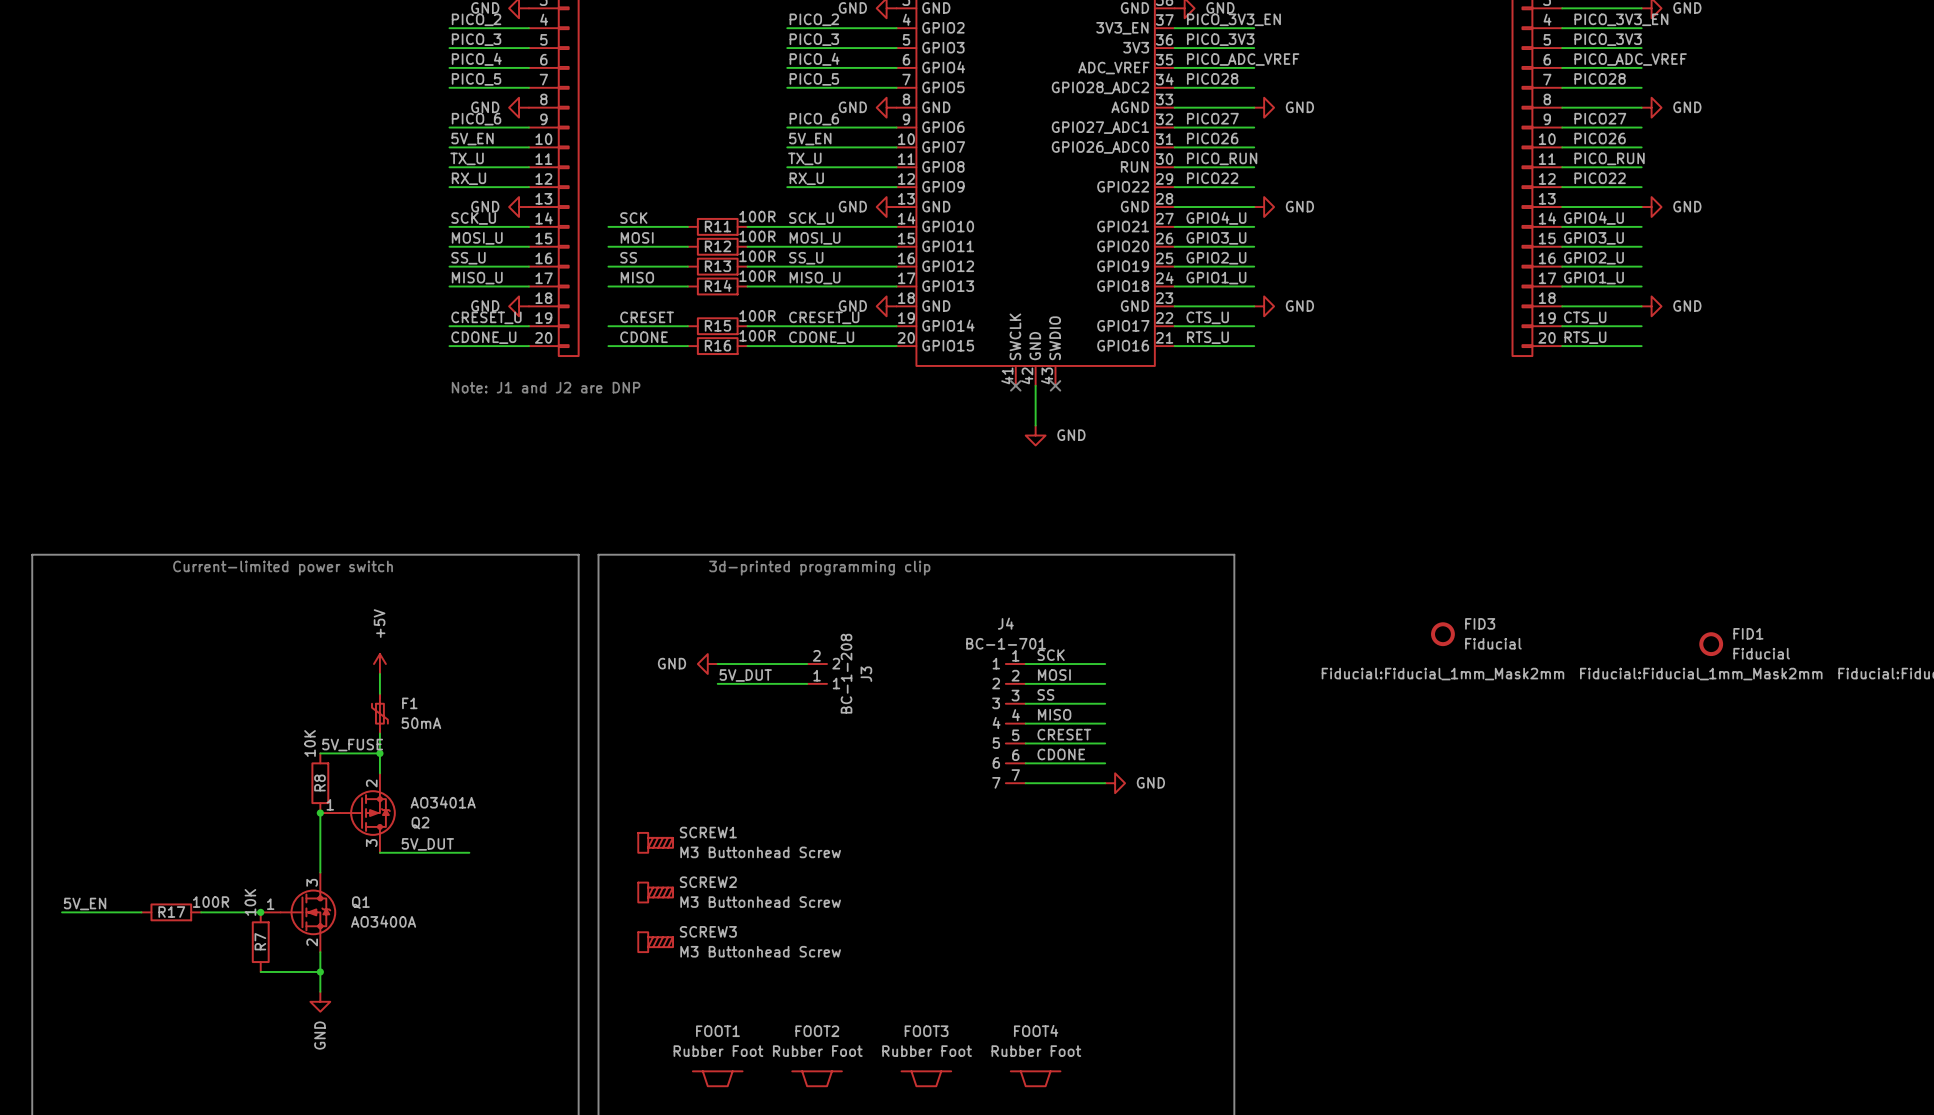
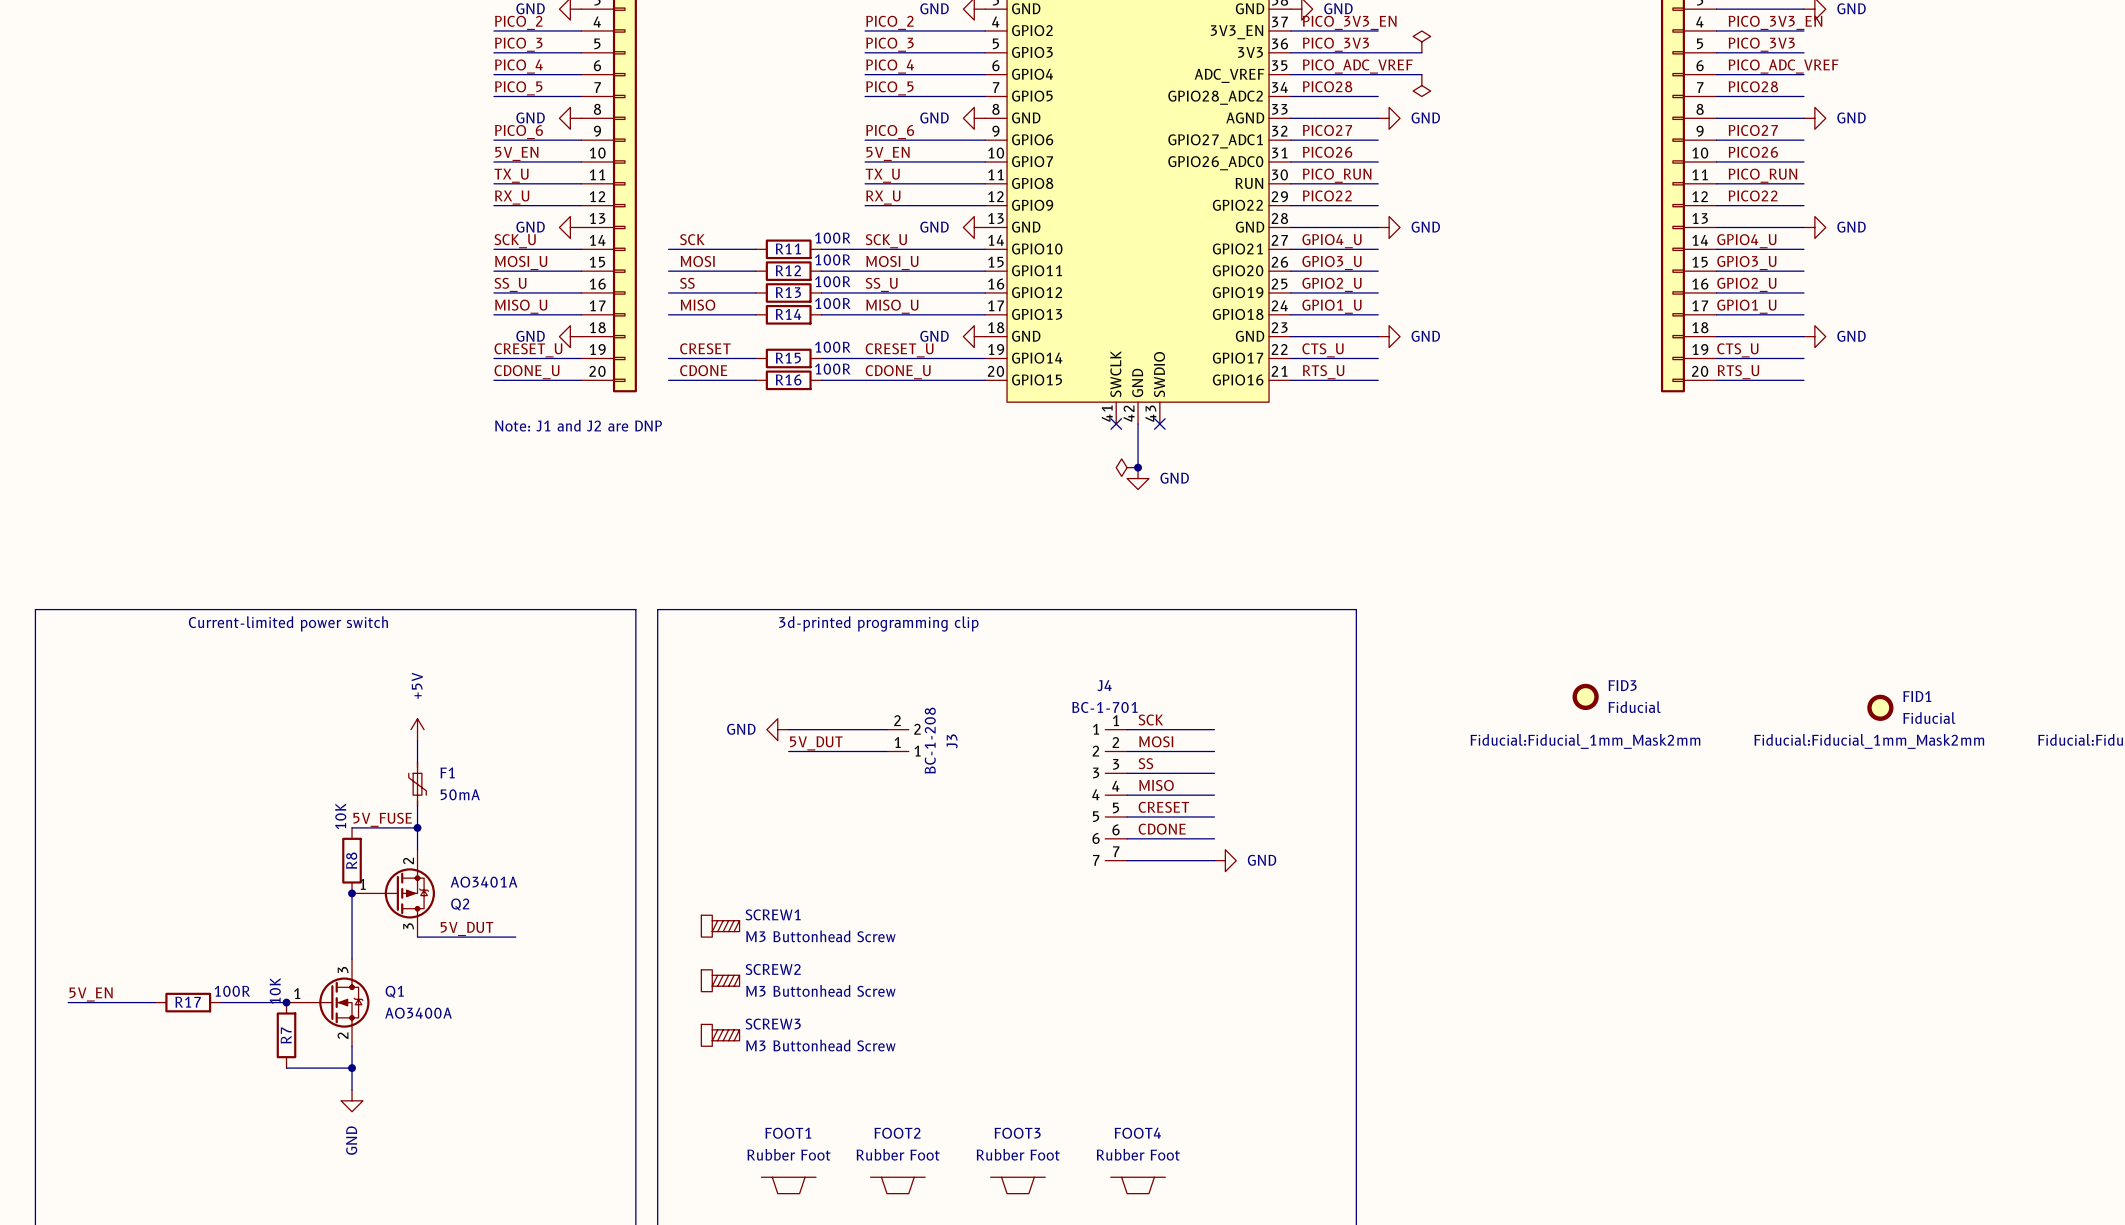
power symbol: none -> (1421, 41)
wire: none -> (1378, 52) (1421, 52)
wire: none -> (1378, 74) (1421, 74)
power symbol: none -> (1421, 85)
power symbol: none -> (1127, 467)
junction: none -> (1138, 467)

